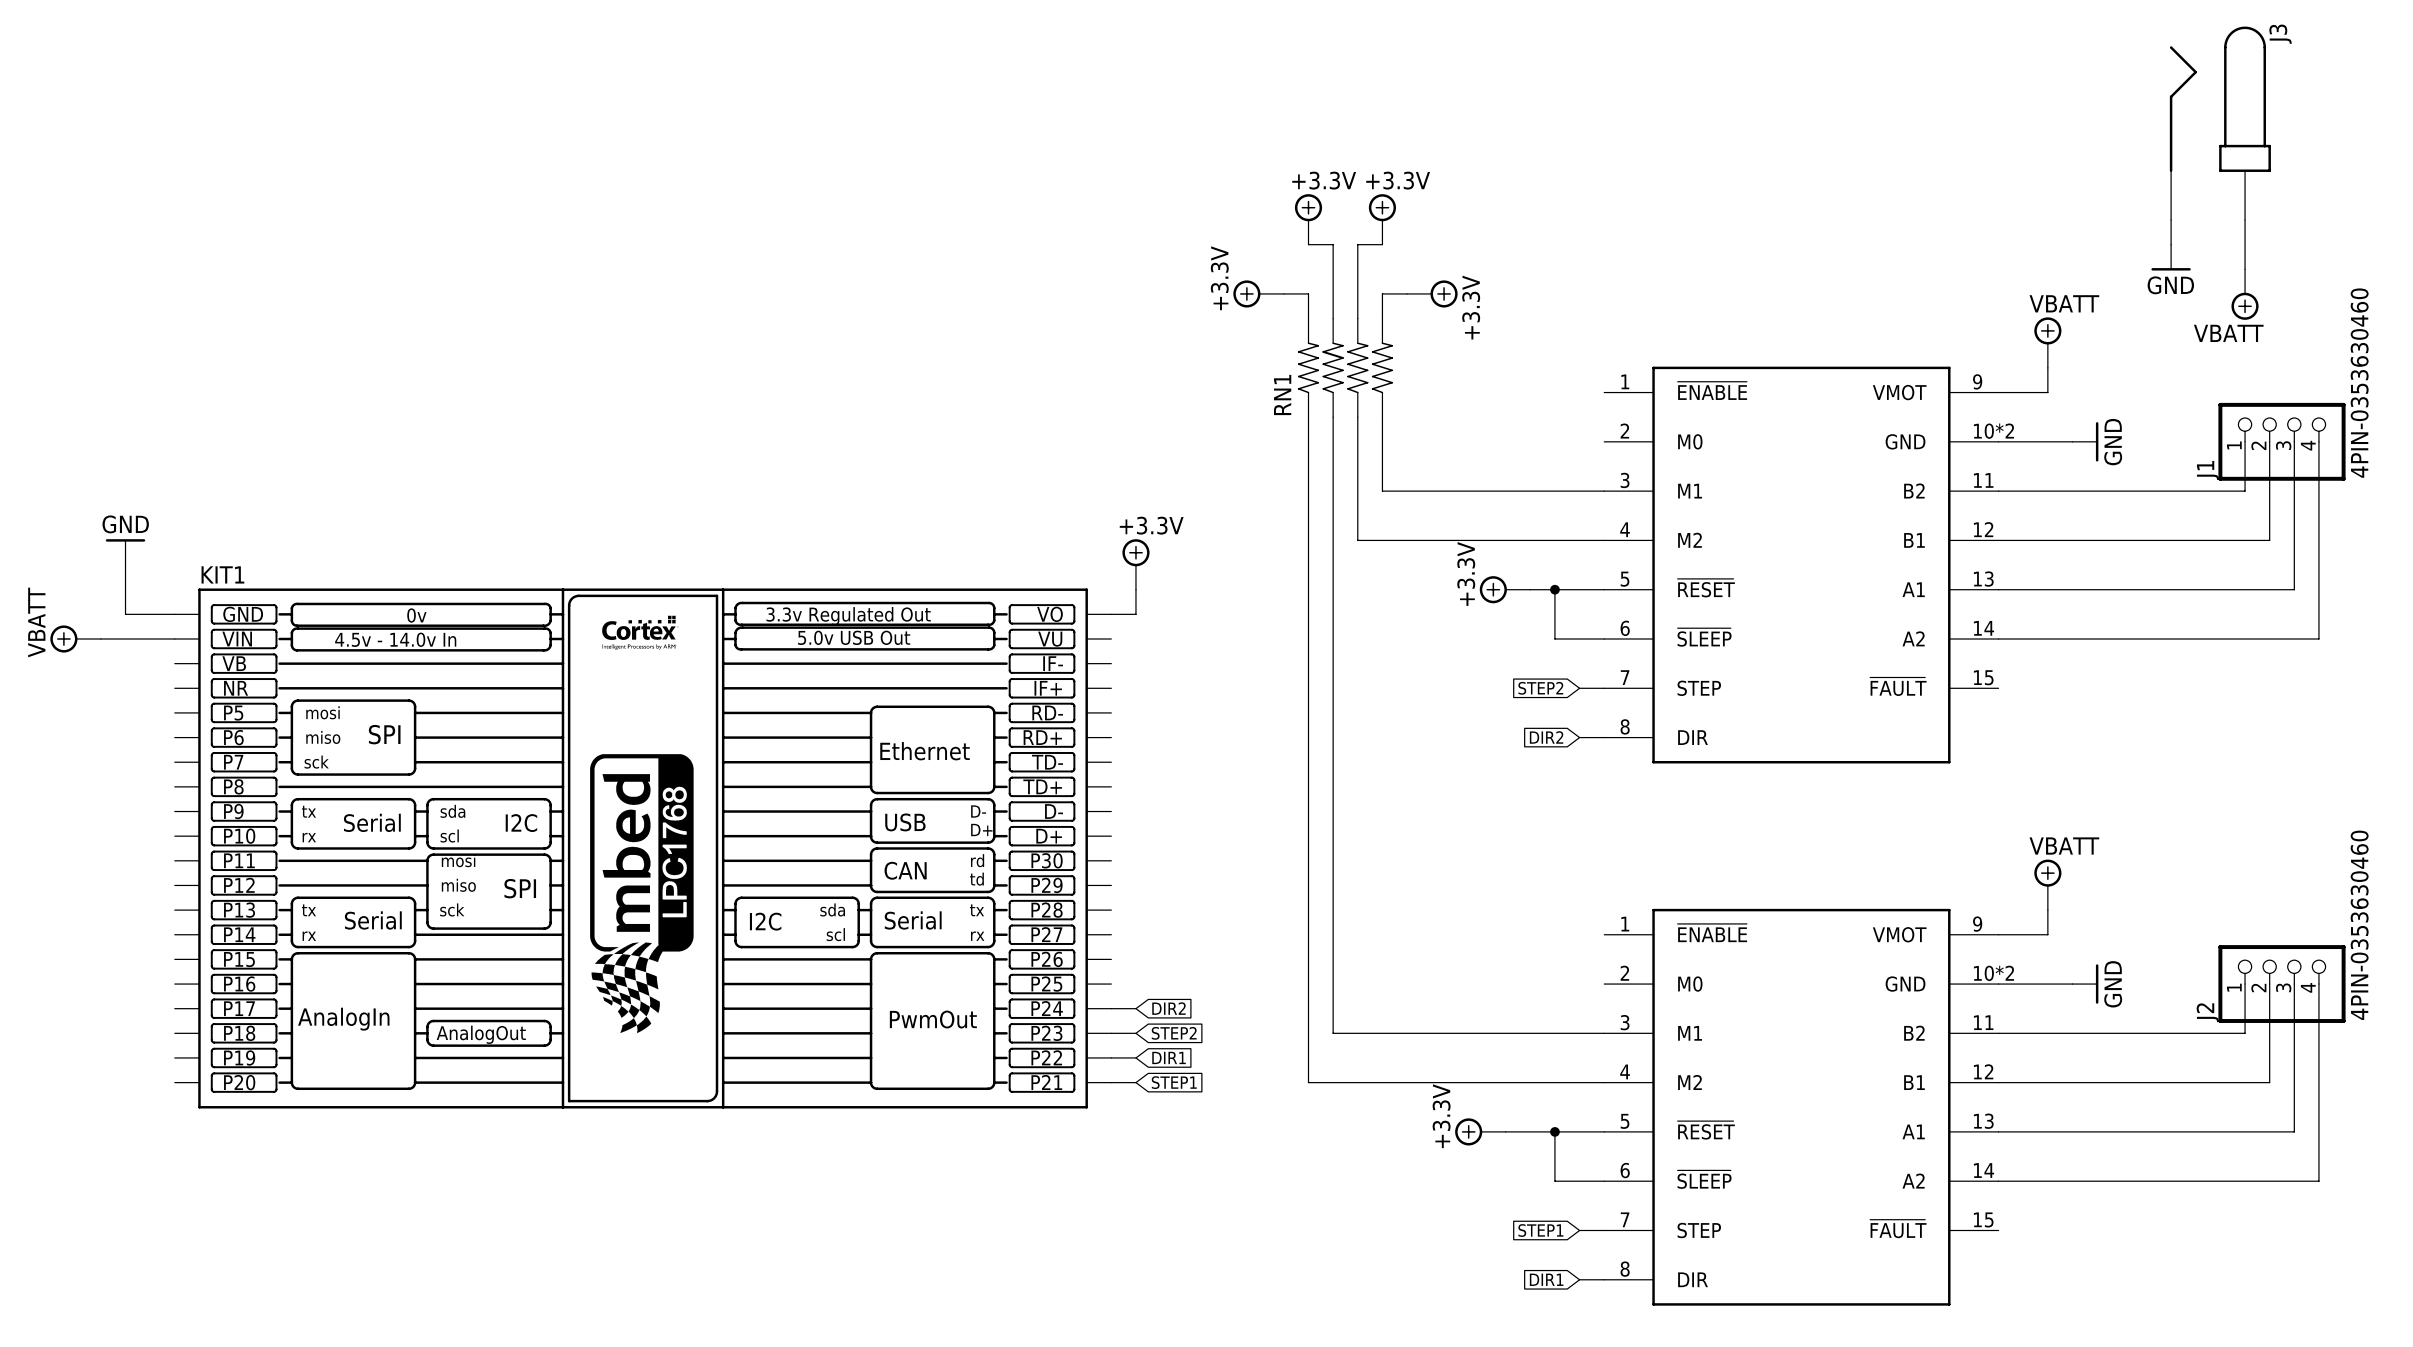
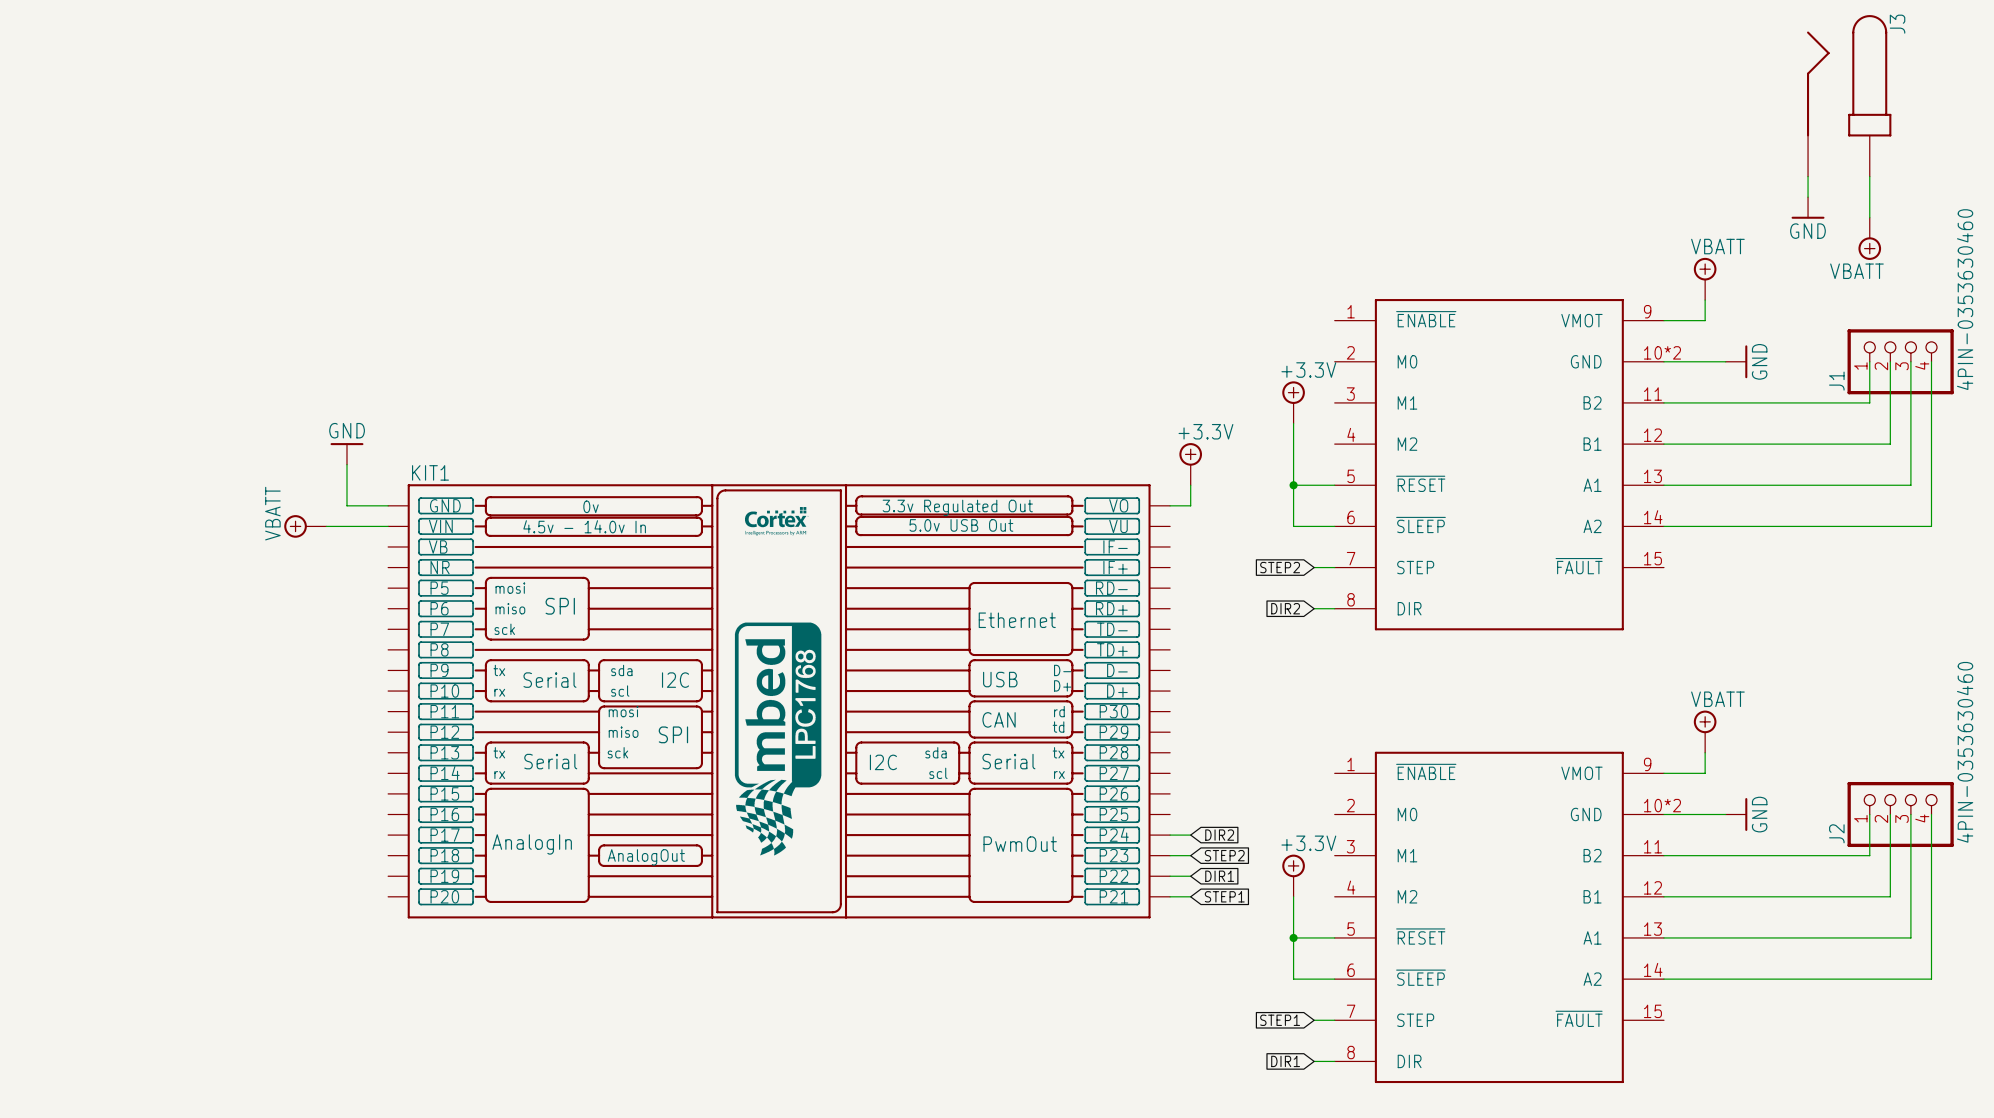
power symbol: +3.3V (1308, 219) -> none
power symbol: +3.3V (1382, 219) -> none
wire: (1308, 244) (1333, 244) (1333, 318) -> none
wire: (1382, 244) (1357, 244) (1357, 318) -> none
power symbol: +3.3V (1258, 293) -> none
wire: (1283, 293) (1308, 293) (1308, 318) -> none
wire: (1407, 293) (1382, 293) (1382, 318) -> none
power symbol: +3.3V (1432, 293) -> none
RN1: (1345, 367) -> none
wire: (1308, 417) (1308, 1082) (1407, 1082) -> none
wire: (1333, 417) (1333, 1033) (1407, 1033) -> none
wire: (1357, 417) (1357, 540) (1604, 540) -> none
wire: (1382, 417) (1382, 491) (1604, 491) -> none
power symbol: none -> +3.3V (1293, 402)
power symbol: GND (125, 552) -> none
power symbol: none -> GND (346, 453)
power symbol: +3.3V (1135, 564) -> none
power symbol: none -> +3.3V (1190, 464)
wire: (125, 565) (125, 614) (174, 614) -> none
wire: none -> (346, 464) (346, 505) (388, 505)
wire: (1135, 589) (1135, 614) (1111, 614) -> none
wire: none -> (1190, 485) (1190, 505) (1170, 505)
power symbol: +3.3V (1505, 589) -> none
wire: (1530, 589) (1554, 589) -> (1293, 423) (1293, 485)
power symbol: VBATT (75, 639) -> none
wire: (100, 639) (174, 639) -> none
power symbol: none -> VBATT (305, 526)
wire: none -> (326, 526) (388, 526)
KIT1 position: (643, 848) -> (779, 701)
global label: DIR2 (1168, 1008) -> none
wire: none -> (1170, 835) (1190, 835)
global label: none -> DIR2 (1219, 835)
global label: STEP2 (1174, 1033) -> none
wire: (1431, 1033) (1604, 1033) -> none
global label: none -> STEP2 (1224, 855)
global label: DIR1 (1169, 1057) -> none
wire: none -> (1170, 876) (1190, 876)
global label: none -> DIR1 (1219, 876)
global label: STEP1 (1174, 1082) -> none
wire: (1431, 1082) (1604, 1082) -> none
global label: none -> STEP1 (1224, 896)
power symbol rotation: 0° (1468, 1131) -> 90° clockwise (1293, 865)
power symbol position: +3.3V (1480, 1131) -> +3.3V (1293, 875)
wire: (1505, 1131) (1554, 1131) -> (1293, 896) (1293, 937)

